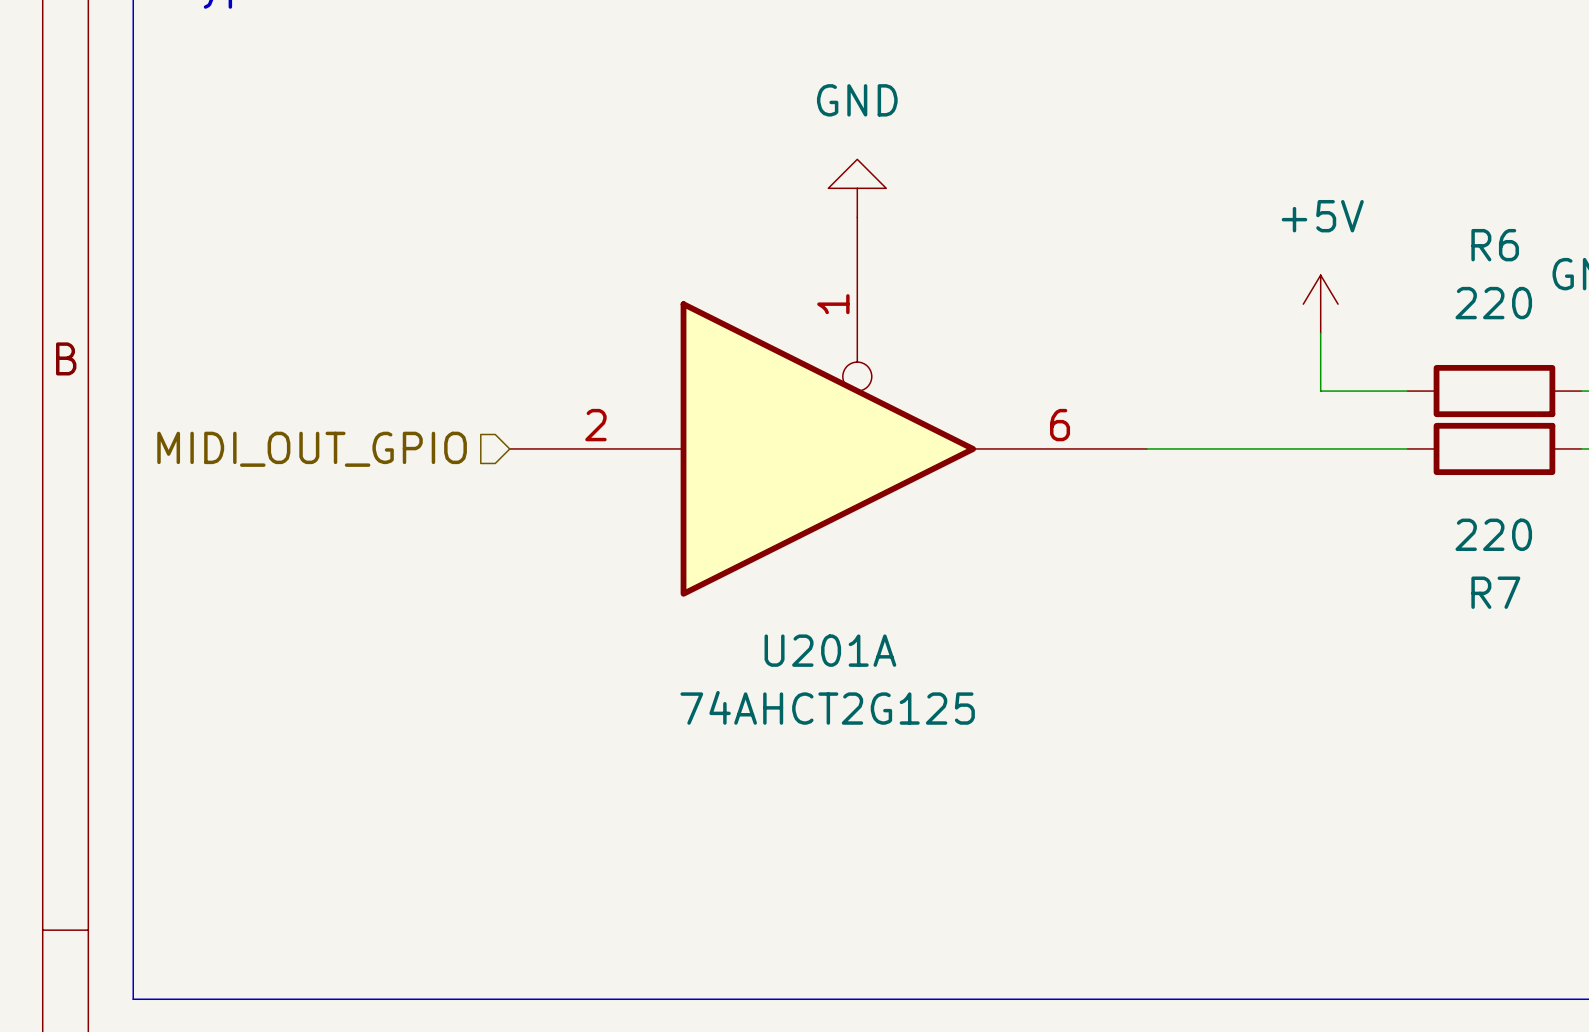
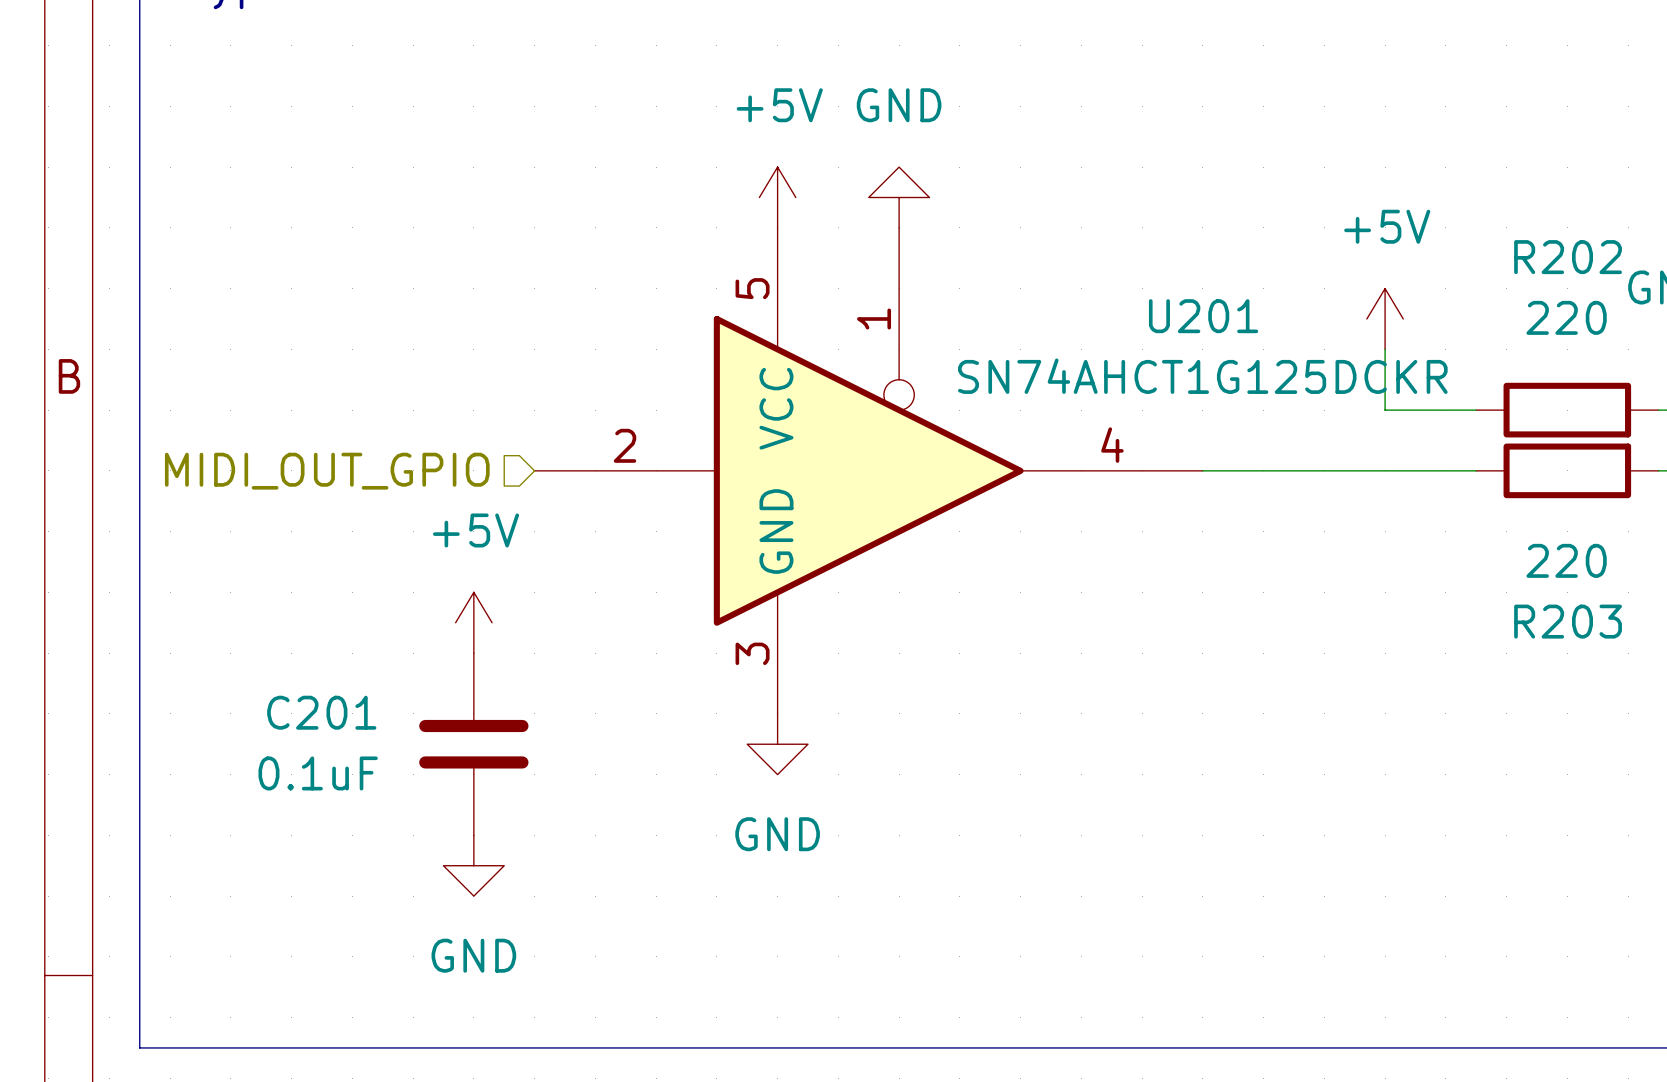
power symbol: none -> +5V (777, 197)
R6 name: R6 (1495, 245) -> R202 (1568, 257)
U201A: 74AHCT2G125 (828, 406) -> none
U201: none -> SN74AHCT1G125DCKR (868, 470)
R7 name: R7 (1495, 592) -> R203 (1568, 621)
power symbol: none -> +5V (473, 622)
C201: none -> 0.1uF (473, 744)
power symbol: none -> GND (777, 744)
power symbol: none -> GND (473, 865)

